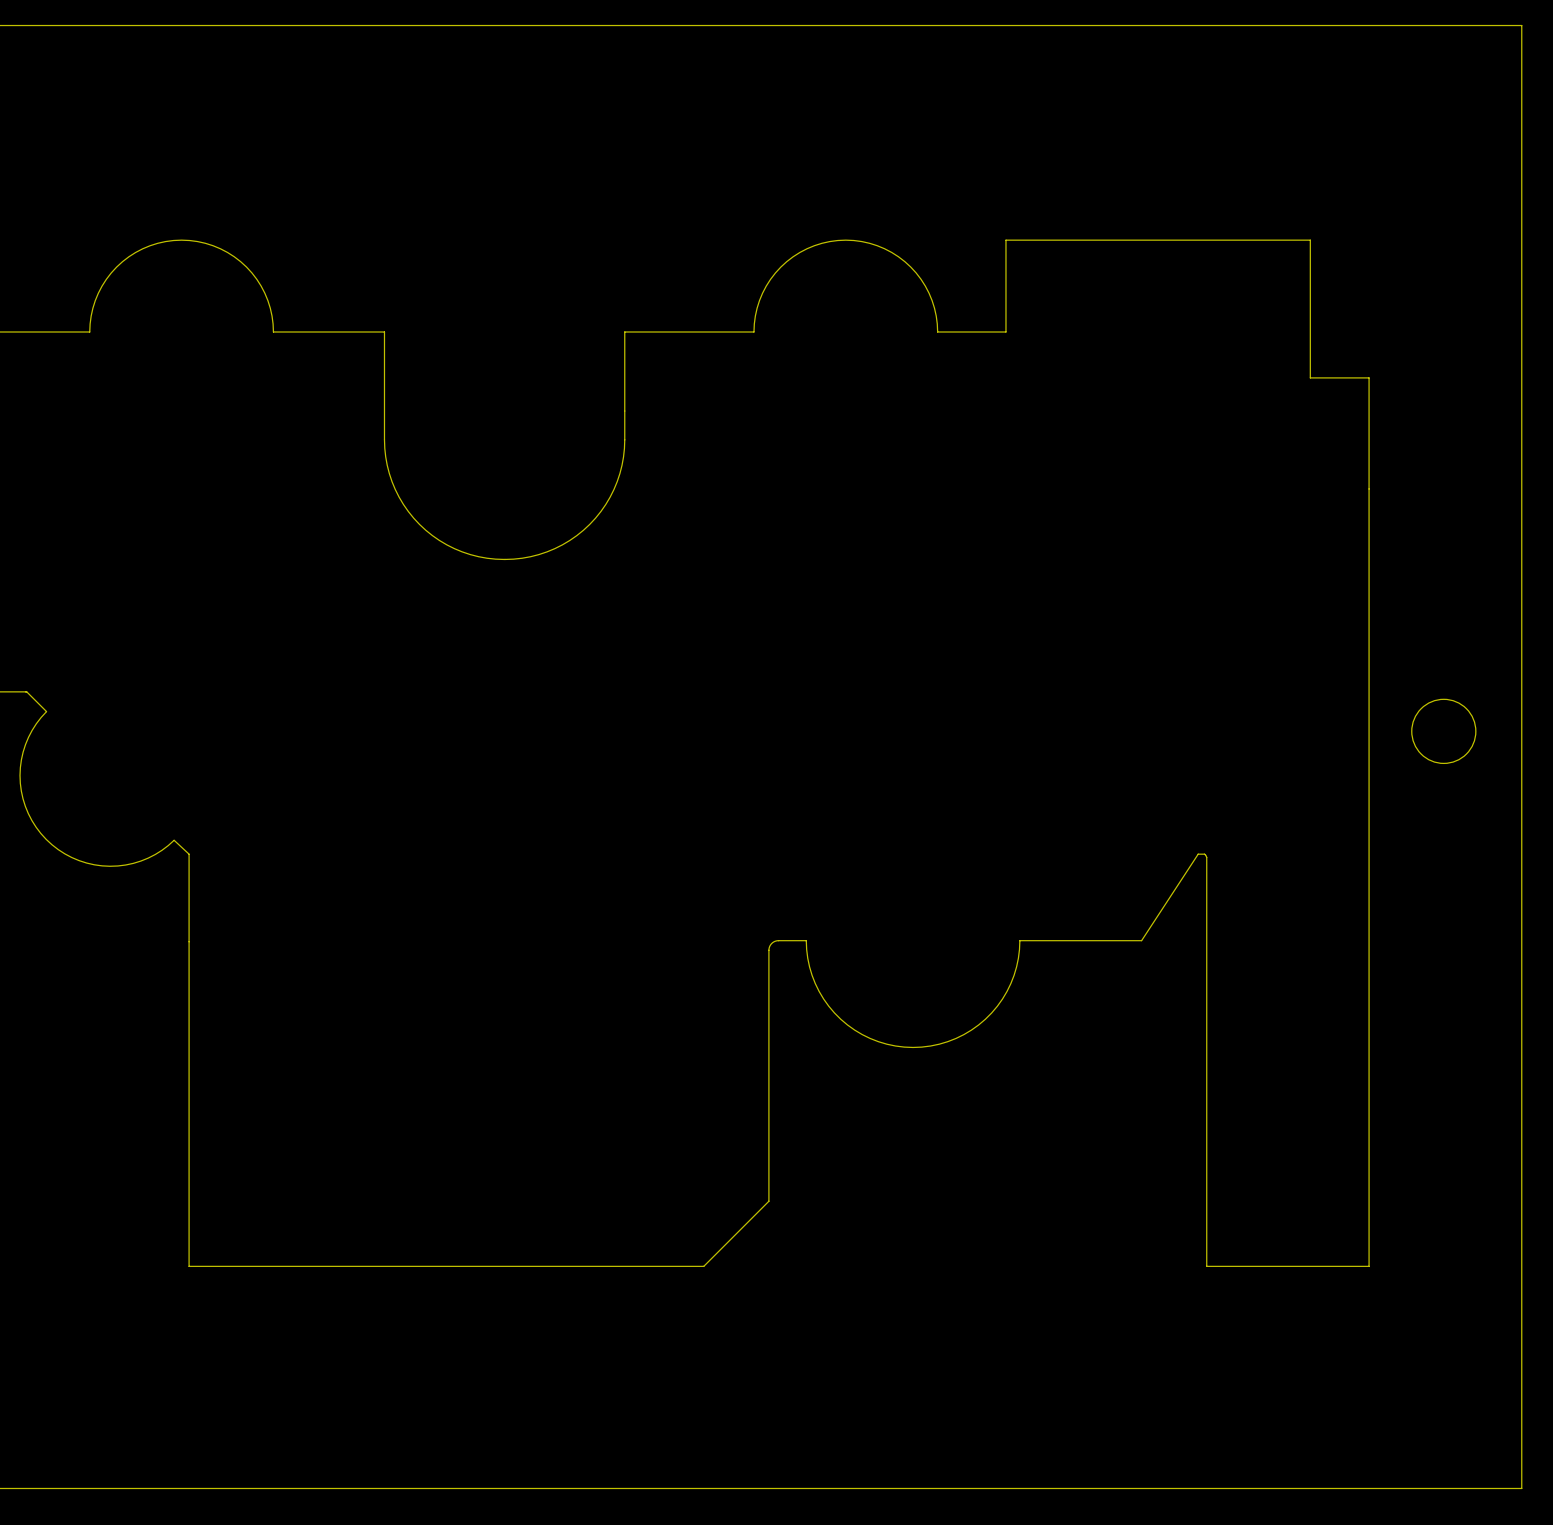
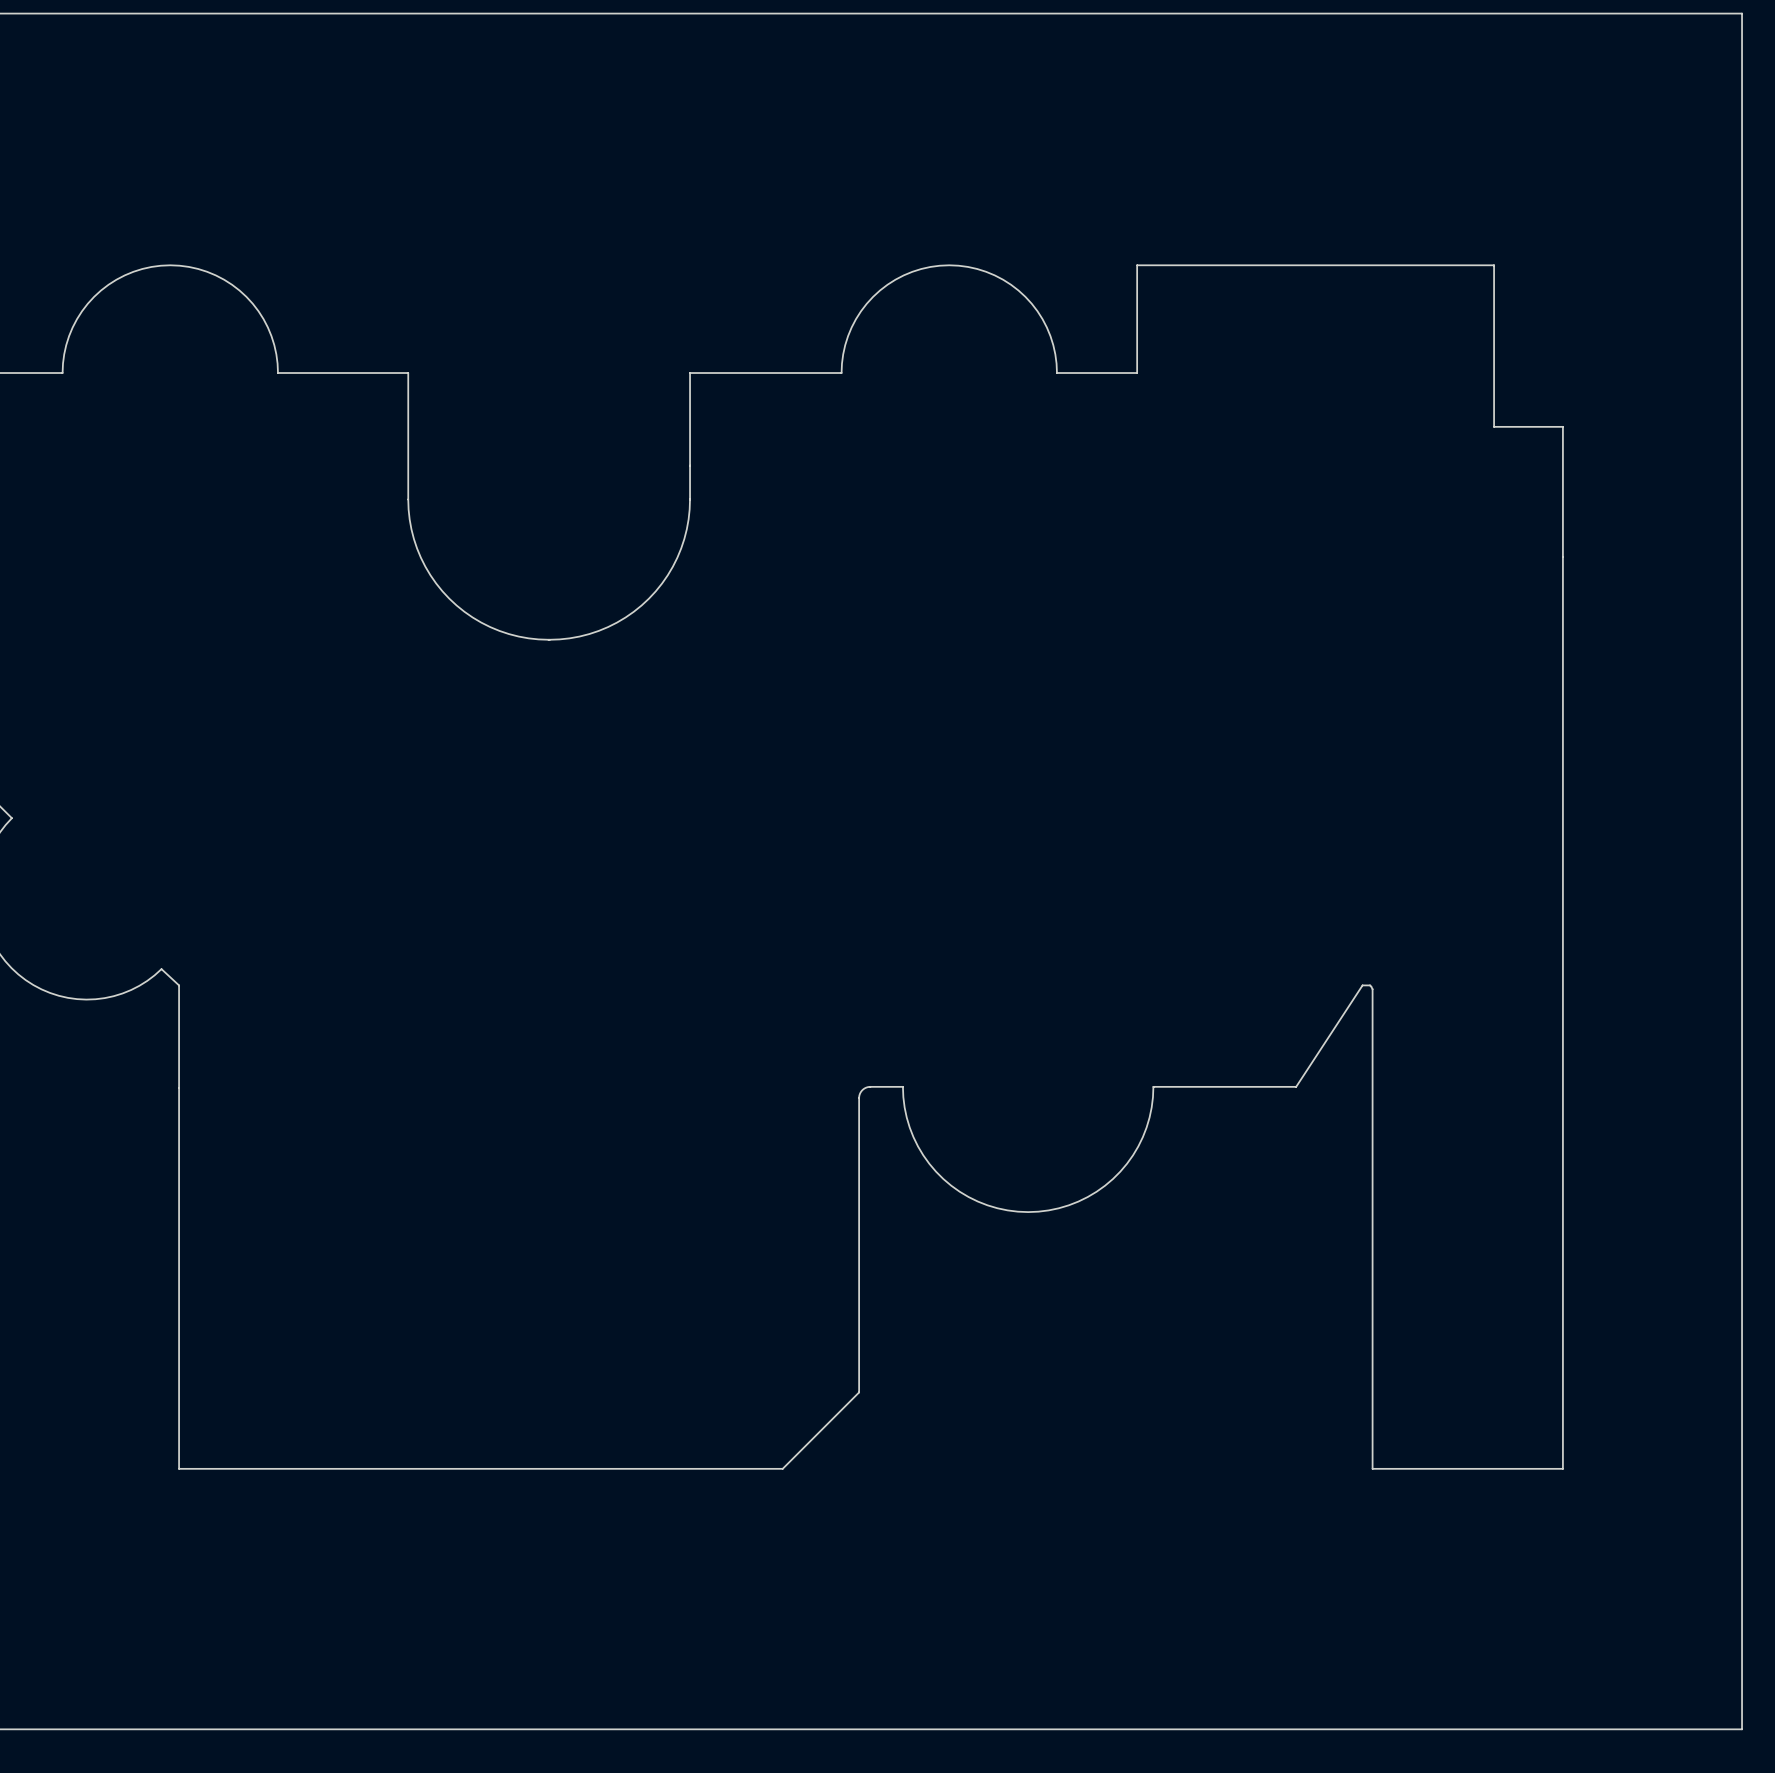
round board edge: [1411, 699, 1476, 764] -> none

